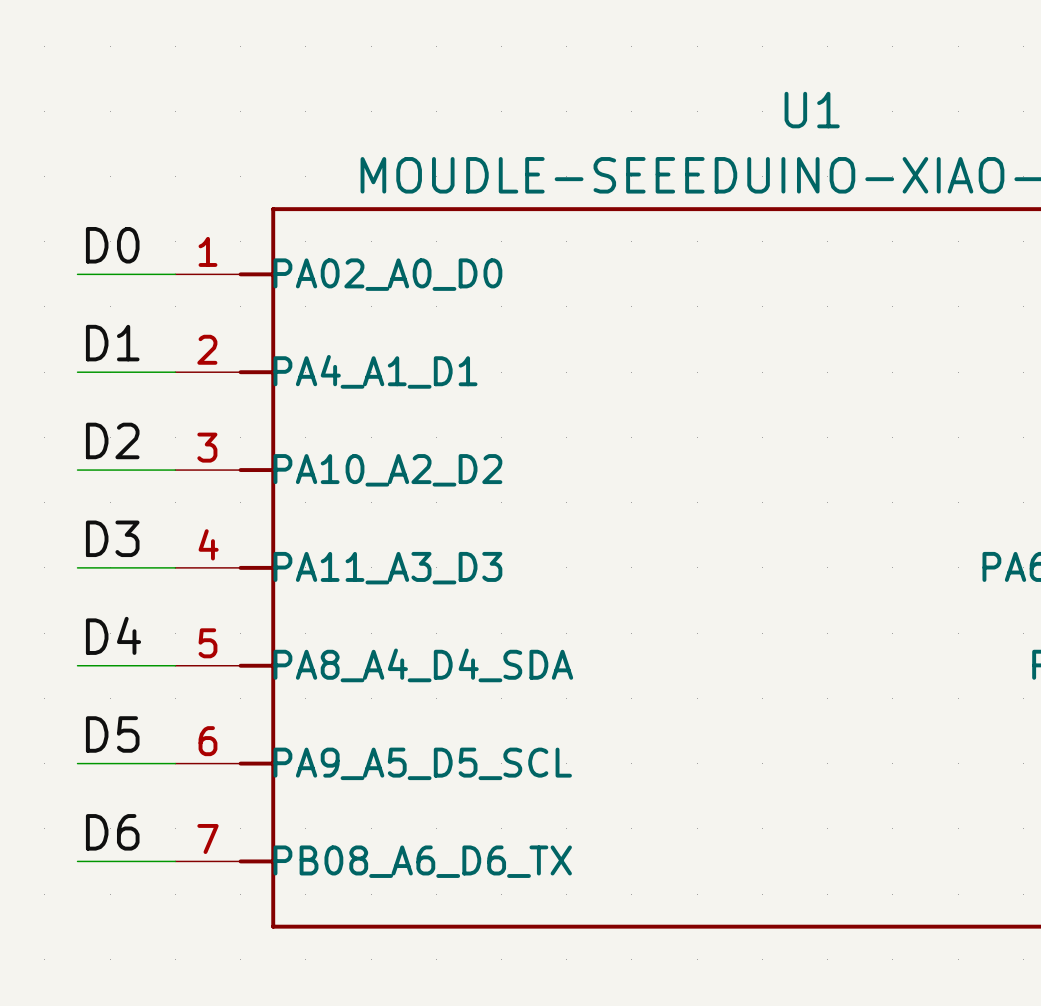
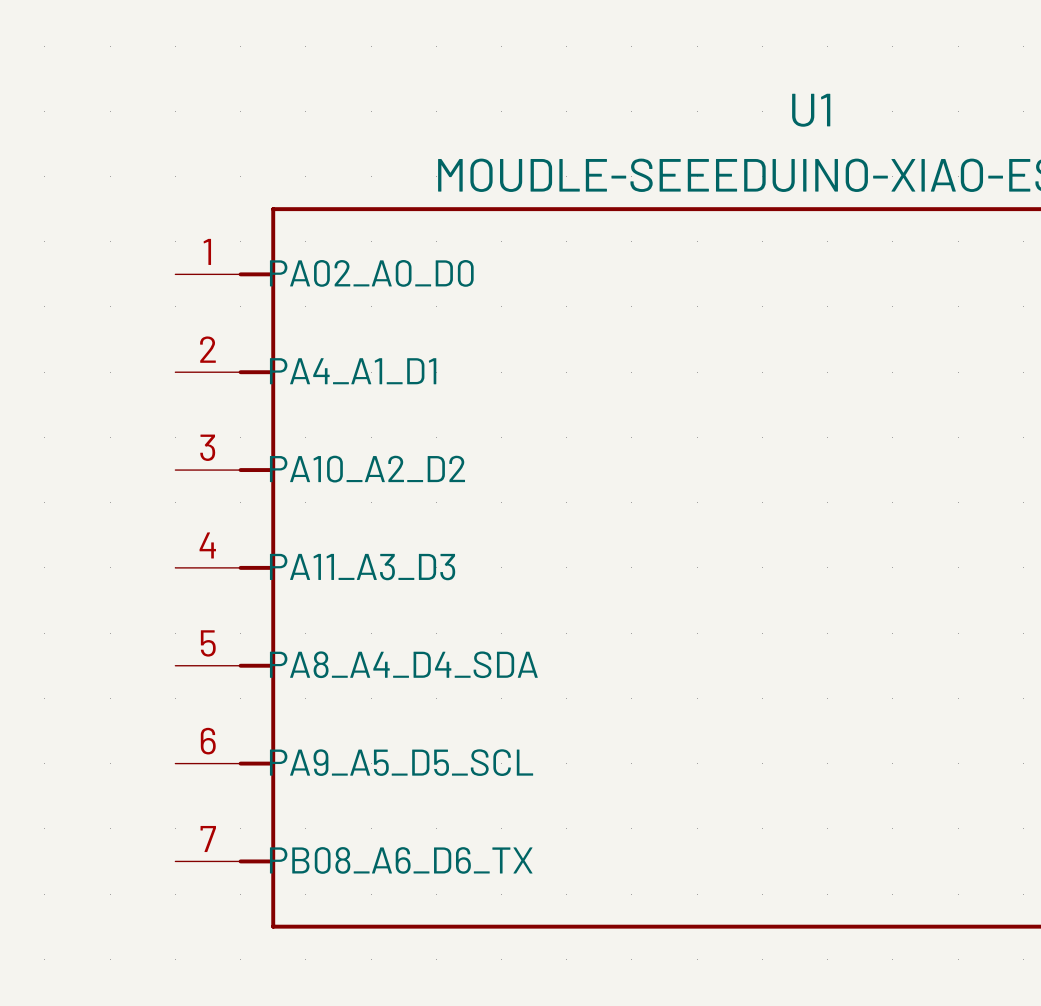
label: D0 (112, 245) -> none
wire: (77, 274) (175, 274) -> none
label: D1 (112, 343) -> none
wire: (77, 372) (175, 372) -> none
label: D2 (112, 440) -> none
wire: (77, 470) (175, 470) -> none
label: D3 (112, 538) -> none
wire: (77, 567) (175, 567) -> none
label: D4 (113, 635) -> none
wire: (77, 665) (175, 665) -> none
label: D5 (112, 734) -> none
wire: (77, 763) (175, 763) -> none
label: D6 (112, 832) -> none
wire: (77, 861) (175, 861) -> none

